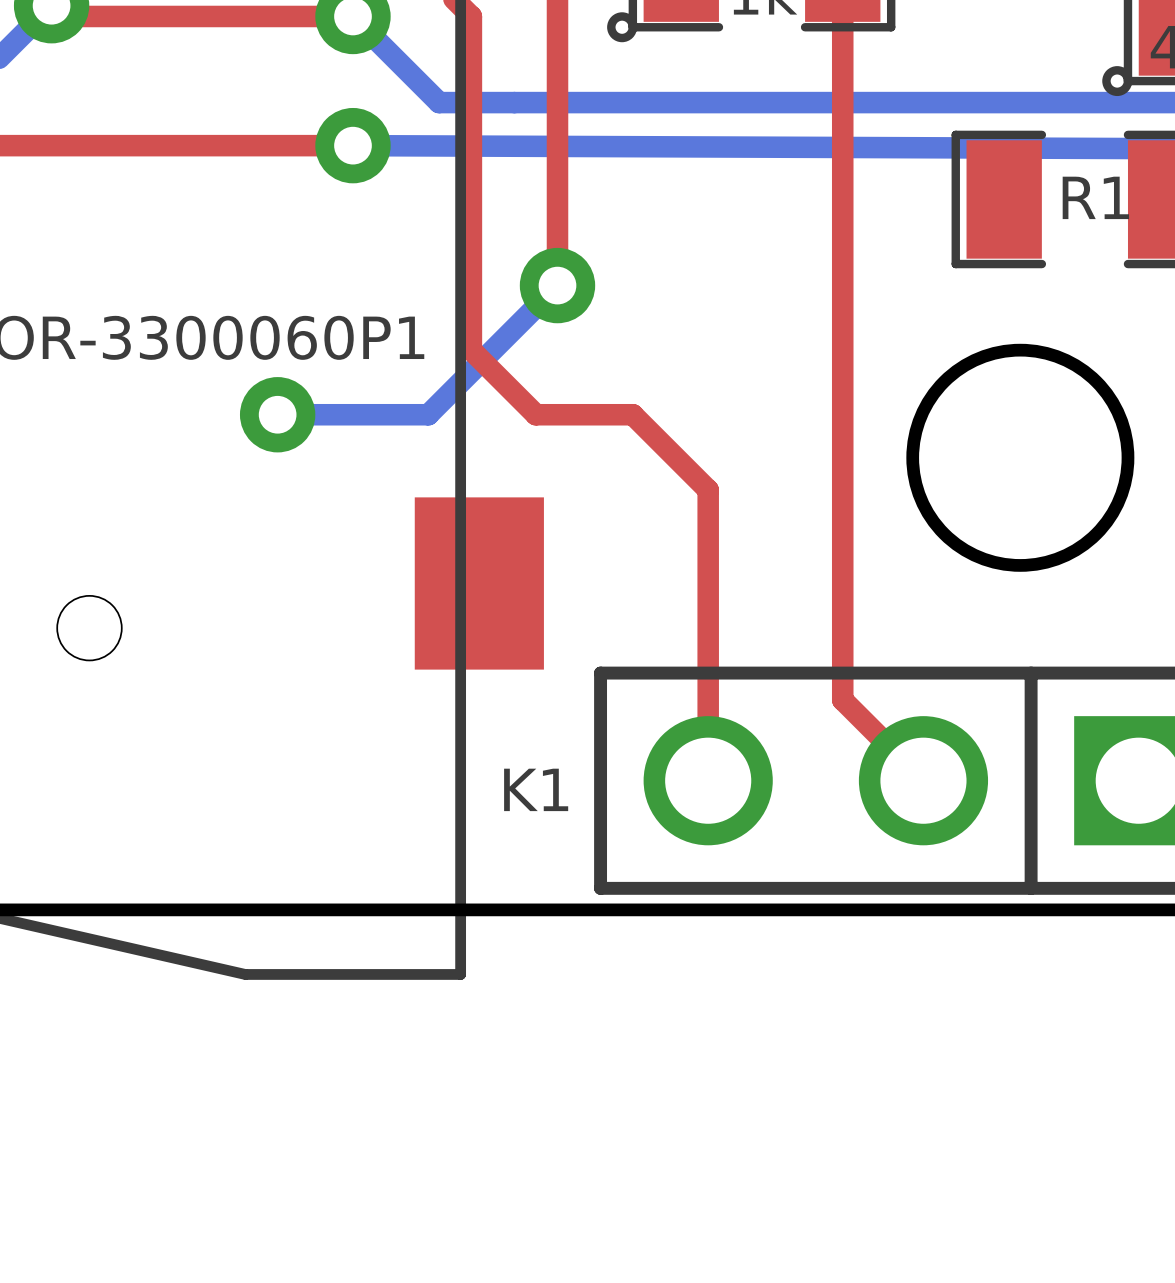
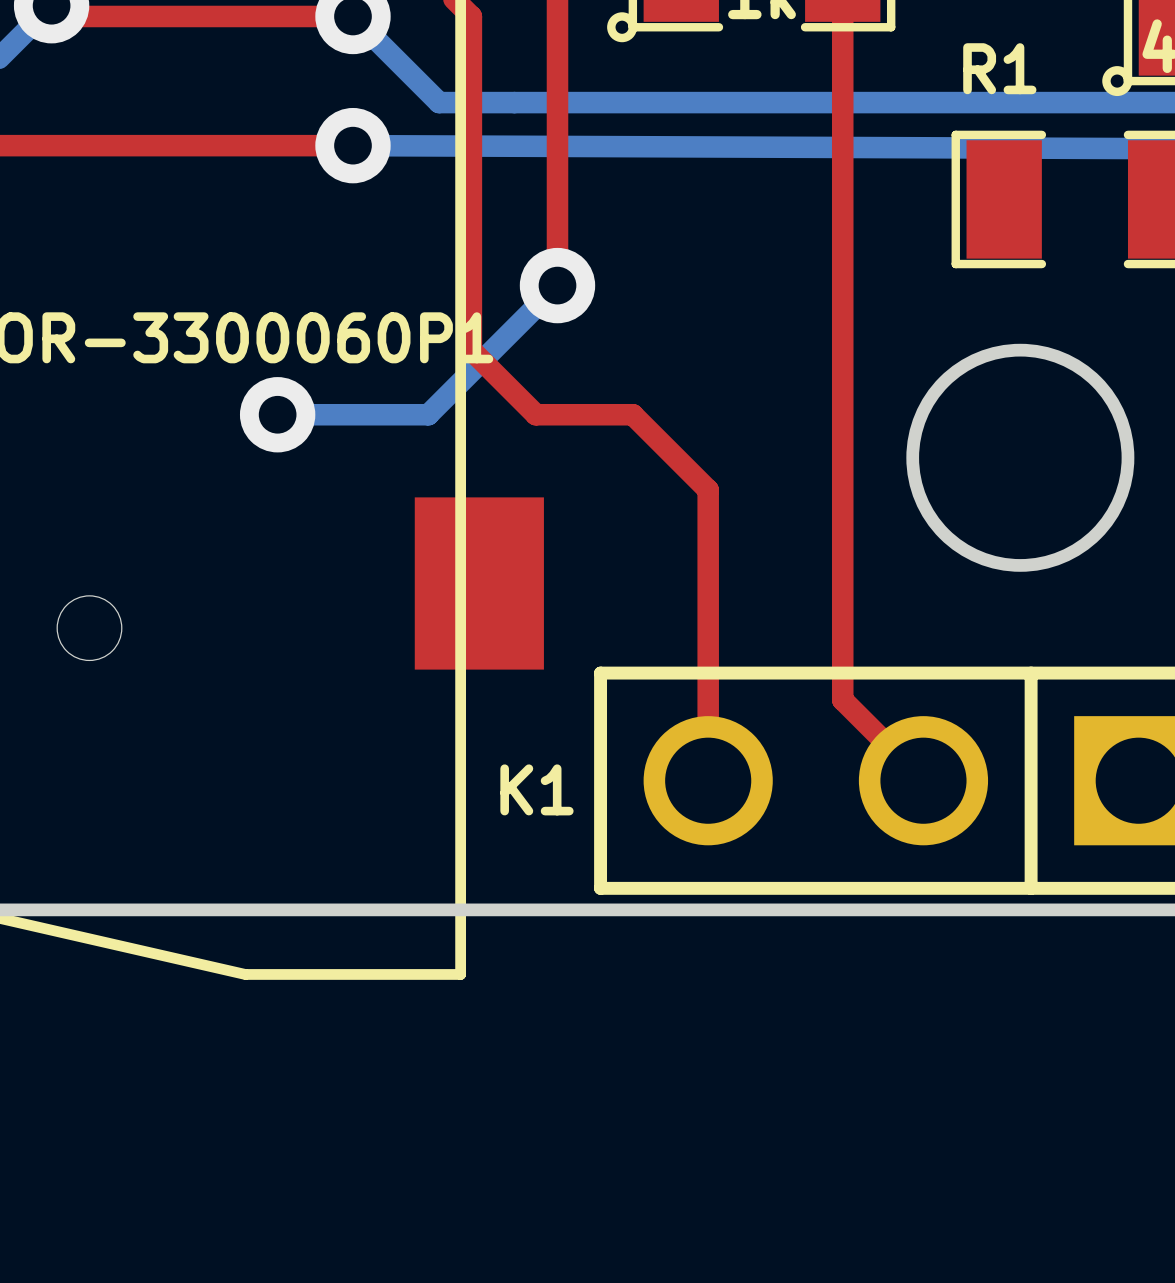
R1 name position: R1 (1095, 197) -> R1 (999, 68)

